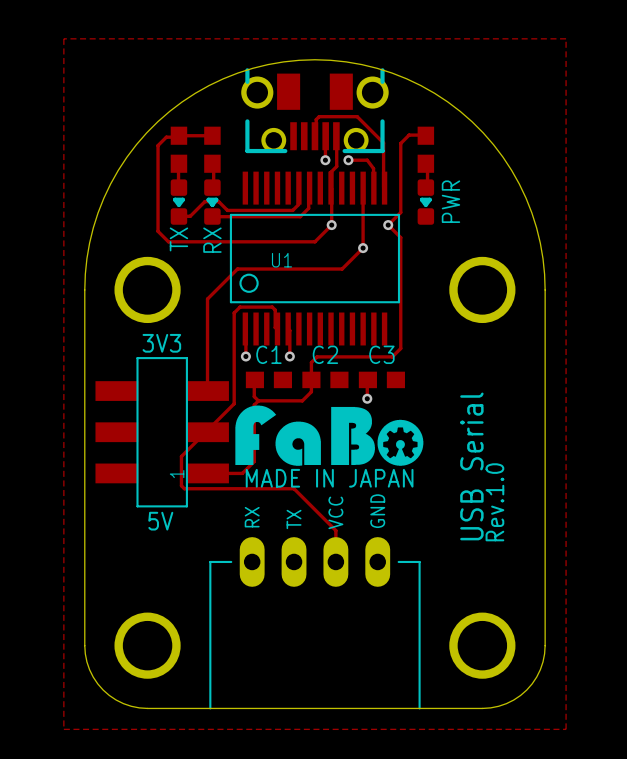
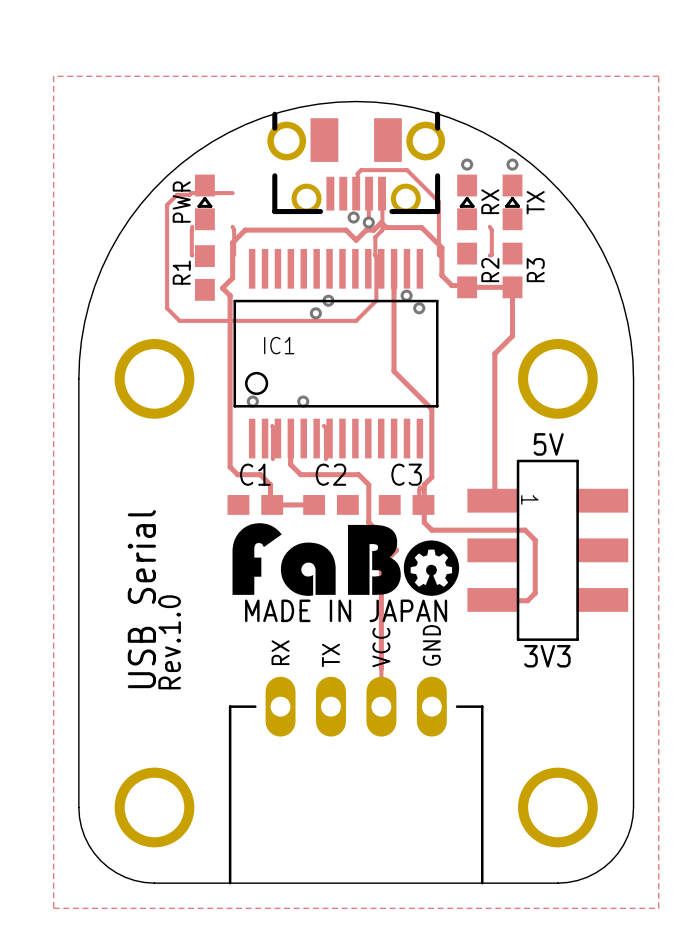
via: none -> (467, 164)
via: none -> (512, 164)
track: (425, 135) (409, 135) (400, 143) (400, 212) (388, 225) (400, 237) (400, 348) (392, 356) (317, 356) (311, 362) (311, 391) (302, 400) (258, 400) -> none
PWR: none -> (204, 202)
RX: none -> (467, 202)
TX: none -> (512, 202)
part: (178, 149) -> none
part: (212, 149) -> none
part: (425, 149) -> none
via: none -> (353, 217)
track: (348, 160) (367, 160) (373, 168) (373, 188) -> none
via: (348, 160) -> none
track: (298, 188) (298, 204) (292, 210) (227, 210) (218, 201) (204, 201) (190, 216) (178, 216) -> none
track: (309, 188) (308, 208) (300, 216) (212, 216) -> none
track: (363, 188) (363, 248) (342, 269) (237, 269) (207, 299) (207, 391) -> none
track: none -> (394, 268) (394, 371) (431, 409) (431, 477) (424, 484) (424, 522) (431, 530) (525, 530) (535, 540) (535, 593) (527, 600) (493, 599)
R2: none -> (467, 270)
R3: none -> (512, 270)
TX: (178, 202) -> none
R1: none -> (204, 272)
RX: (212, 202) -> none
PWR: (425, 202) -> none
via: none -> (406, 295)
via: none -> (328, 300)
via: (331, 225) -> none
via: (388, 225) -> none
via: none -> (419, 308)
via: none -> (315, 313)
via: (363, 248) -> none
U1: (314, 258) -> none
IC1: none -> (336, 353)
via: none -> (252, 401)
via: none -> (303, 401)
track: (277, 328) (275, 327) (275, 310) (272, 307) (240, 307) (234, 312) (234, 403) (181, 456) (181, 485) (184, 488) (294, 488) (335, 530) -> (290, 457) (290, 464) (300, 474) (358, 474) (368, 484) (368, 522) (396, 550) (381, 565) (381, 668)
text position: 3V3 (161, 343) -> 3V3 (547, 656)
via: (245, 356) -> none
via: (289, 356) -> none
track: (254, 379) (254, 396) (258, 400) -> none
C1 position: (268, 379) -> (255, 504)
C2 position: (325, 379) -> (330, 504)
C3 position: (381, 379) -> (406, 504)
track: none -> (493, 500) (494, 499) (494, 353) (512, 336) (512, 287) (452, 285) (441, 275) (441, 247) (421, 227) (386, 227) (381, 222) (373, 230) (366, 230) (356, 240) (346, 230) (245, 230) (232, 242) (232, 278) (222, 288) (230, 295) (230, 467) (237, 474) (260, 474) (270, 484) (270, 503) (272, 504) (314, 504)
via: (367, 398) -> none
track: (258, 400) (254, 405) (254, 461) (242, 473) (207, 473) -> none
part rotation: 0° (162, 432) -> 180° (547, 550)
part position: (162, 432) -> (547, 550)
drawing position: (329, 435) -> (345, 559)
text position: USB Serial (471, 466) -> USB Serial (141, 599)
text position: MADE IN JAPAN (329, 478) -> MADE IN JAPAN (346, 610)
text position: Rev.1.0 (494, 502) -> Rev.1.0 (169, 642)
text position: 5V (160, 521) -> 5V (548, 444)

